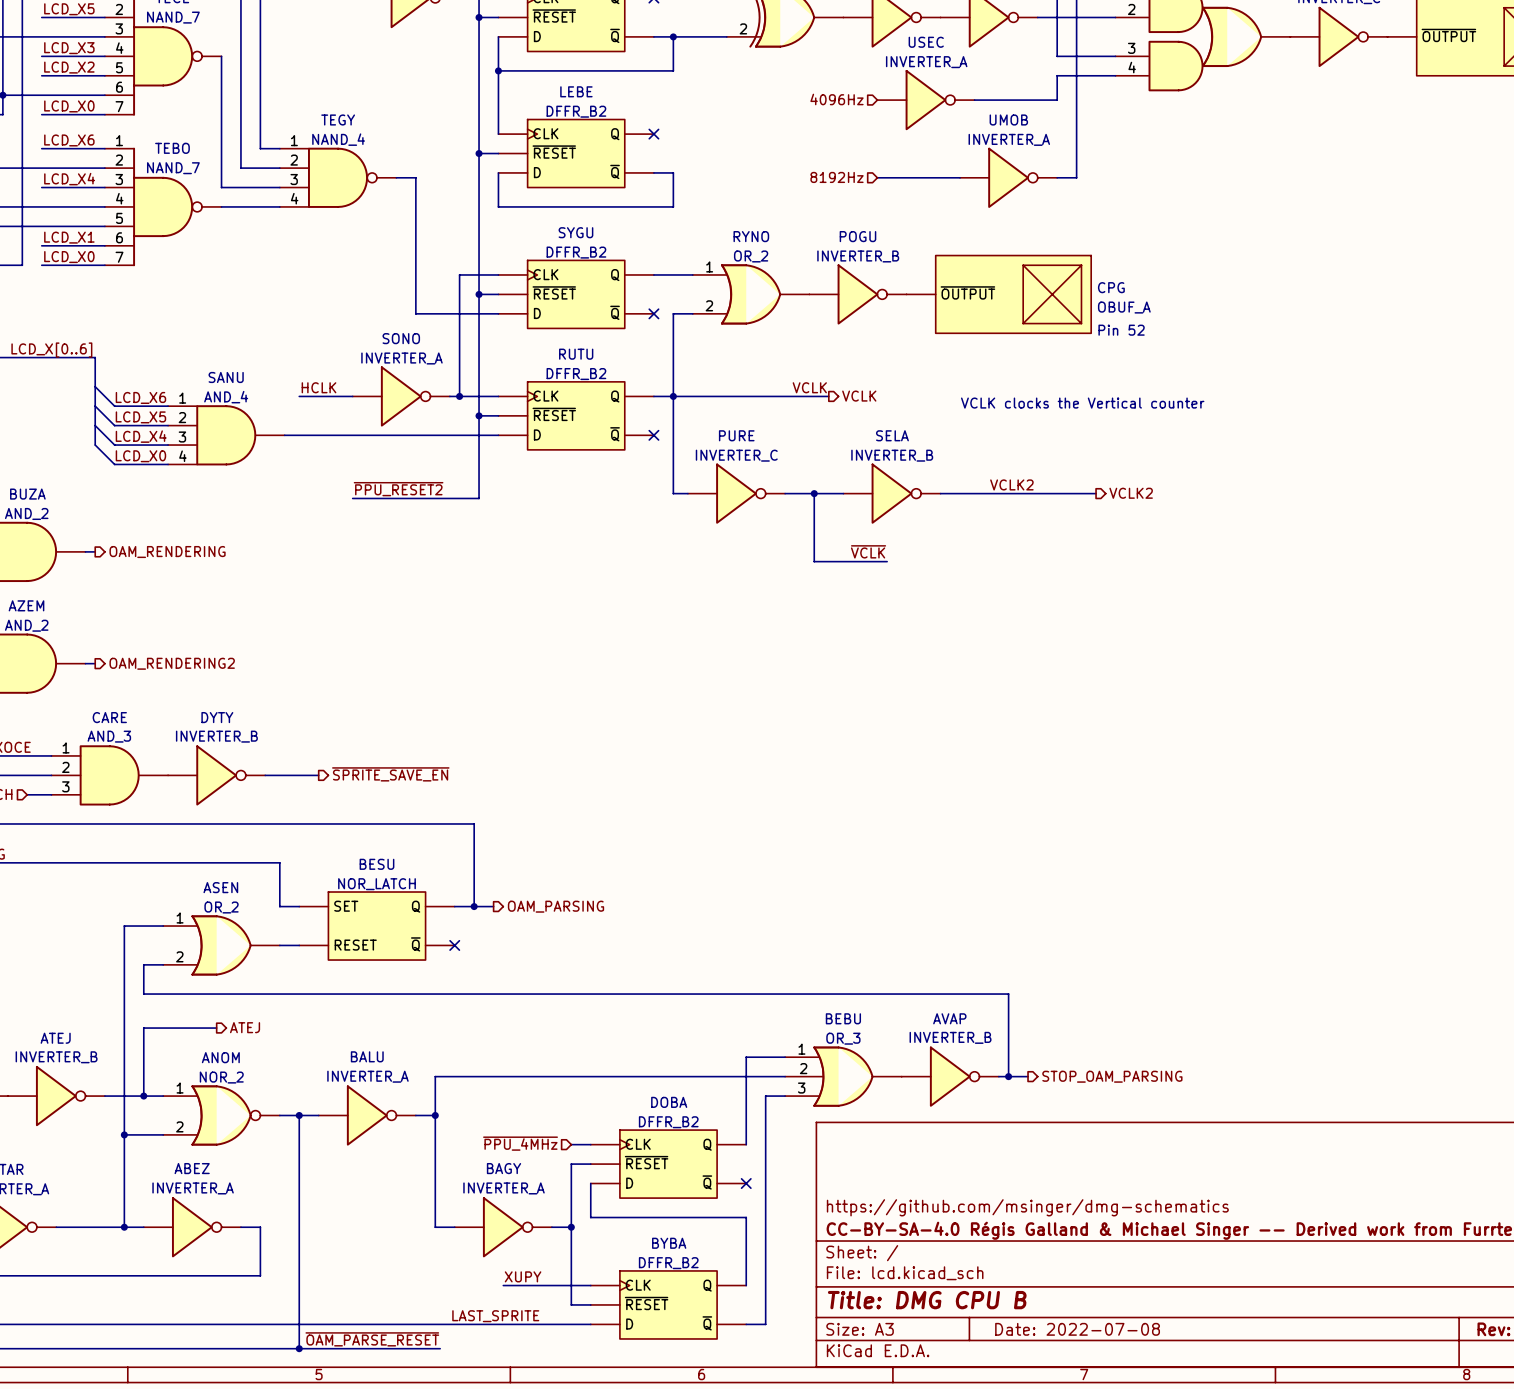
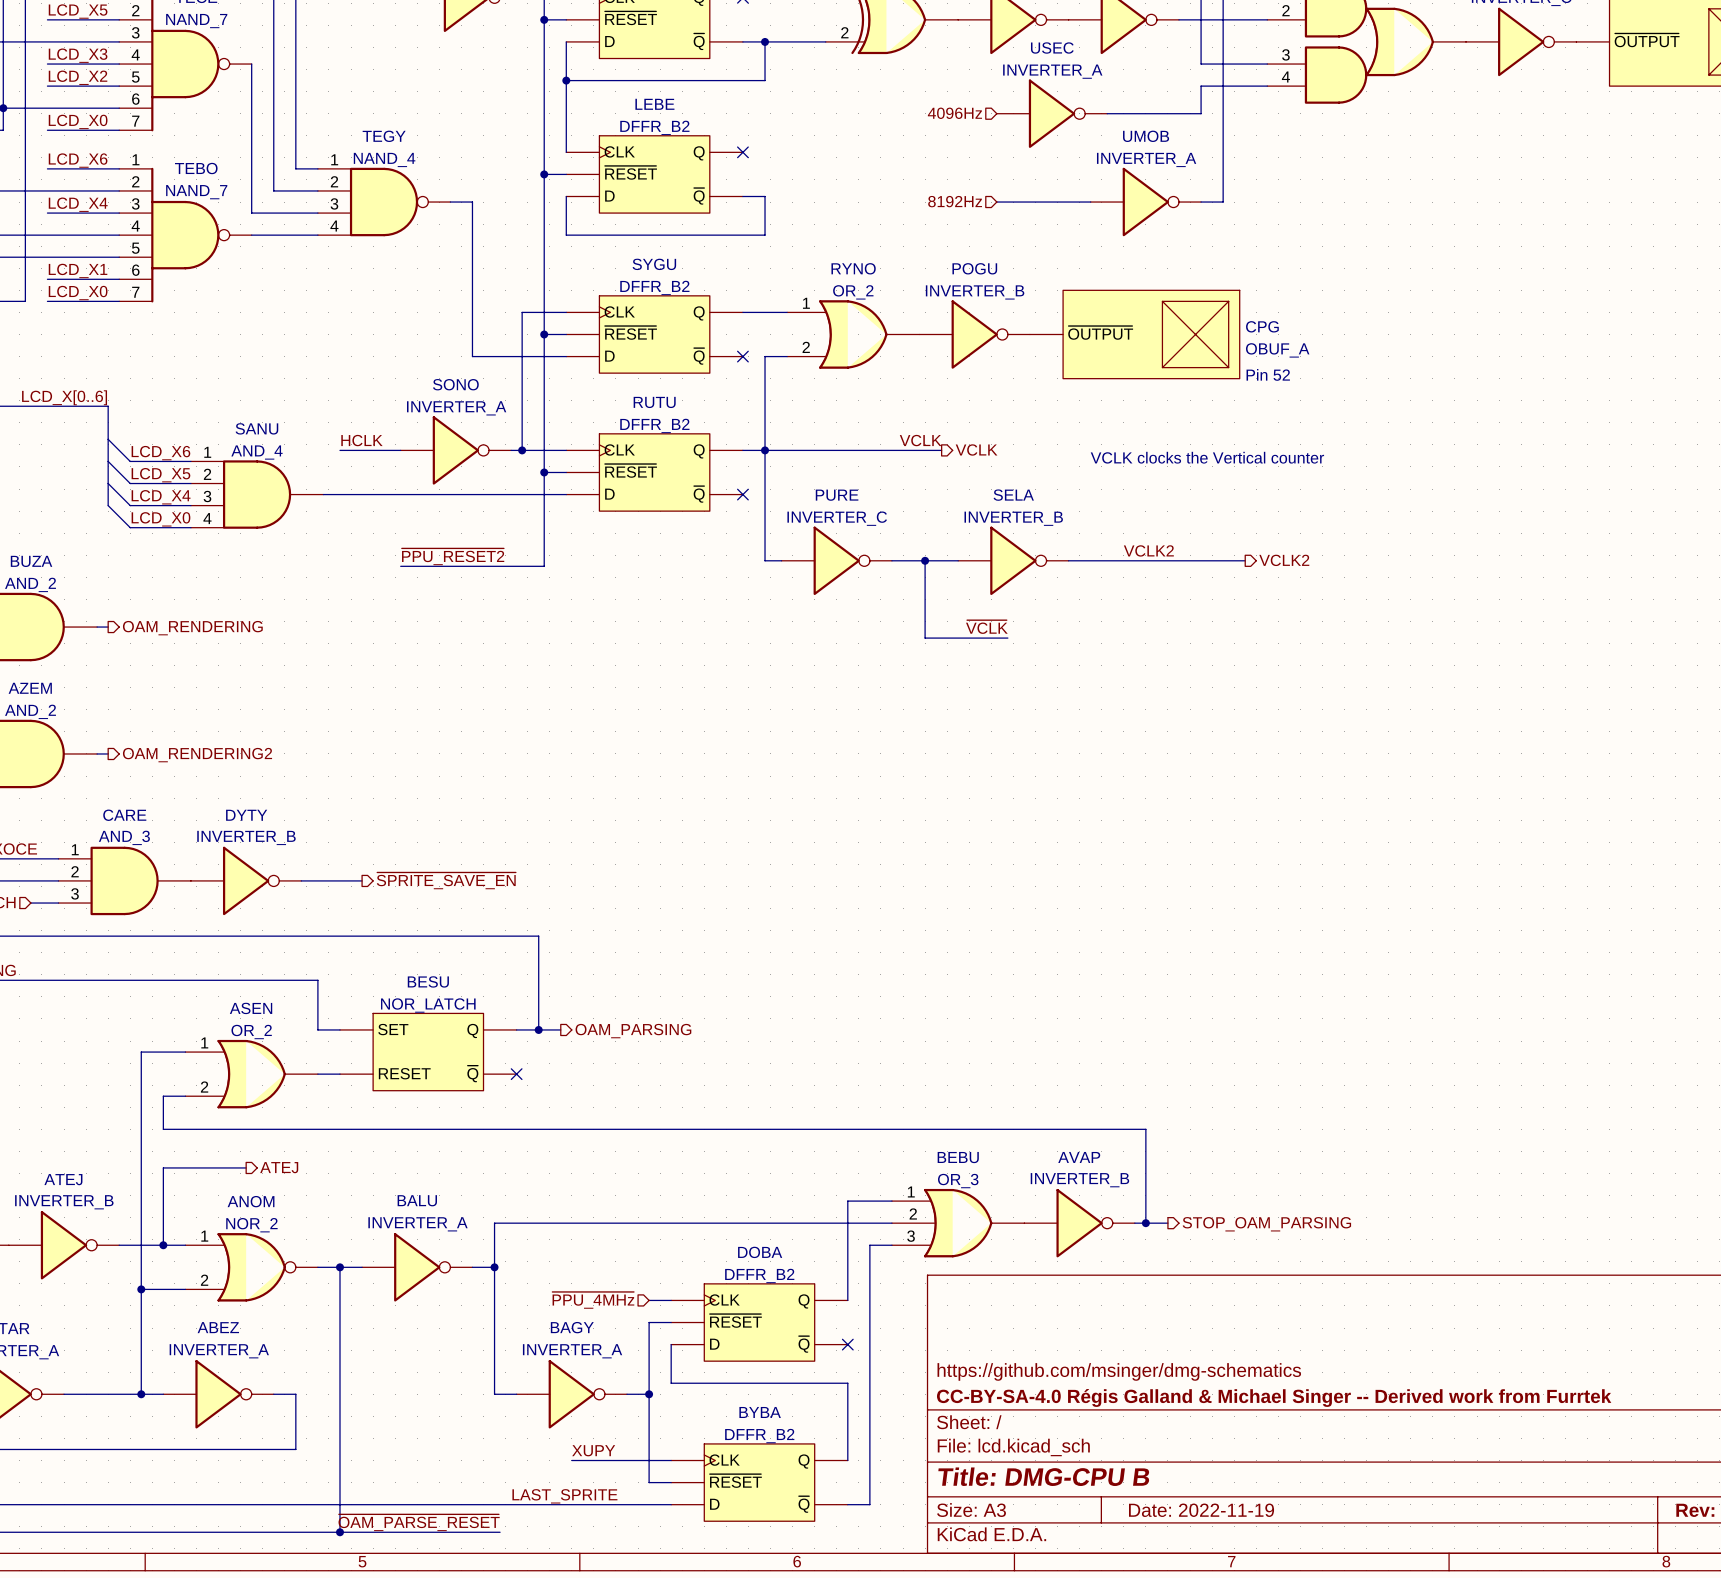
title block: Title: DMG CPU B (927, 1300) -> Title: DMG-CPU B (1043, 1476)
title block: Date: 2022-07-08 (1077, 1329) -> Date: 2022-11-19 (1201, 1510)

